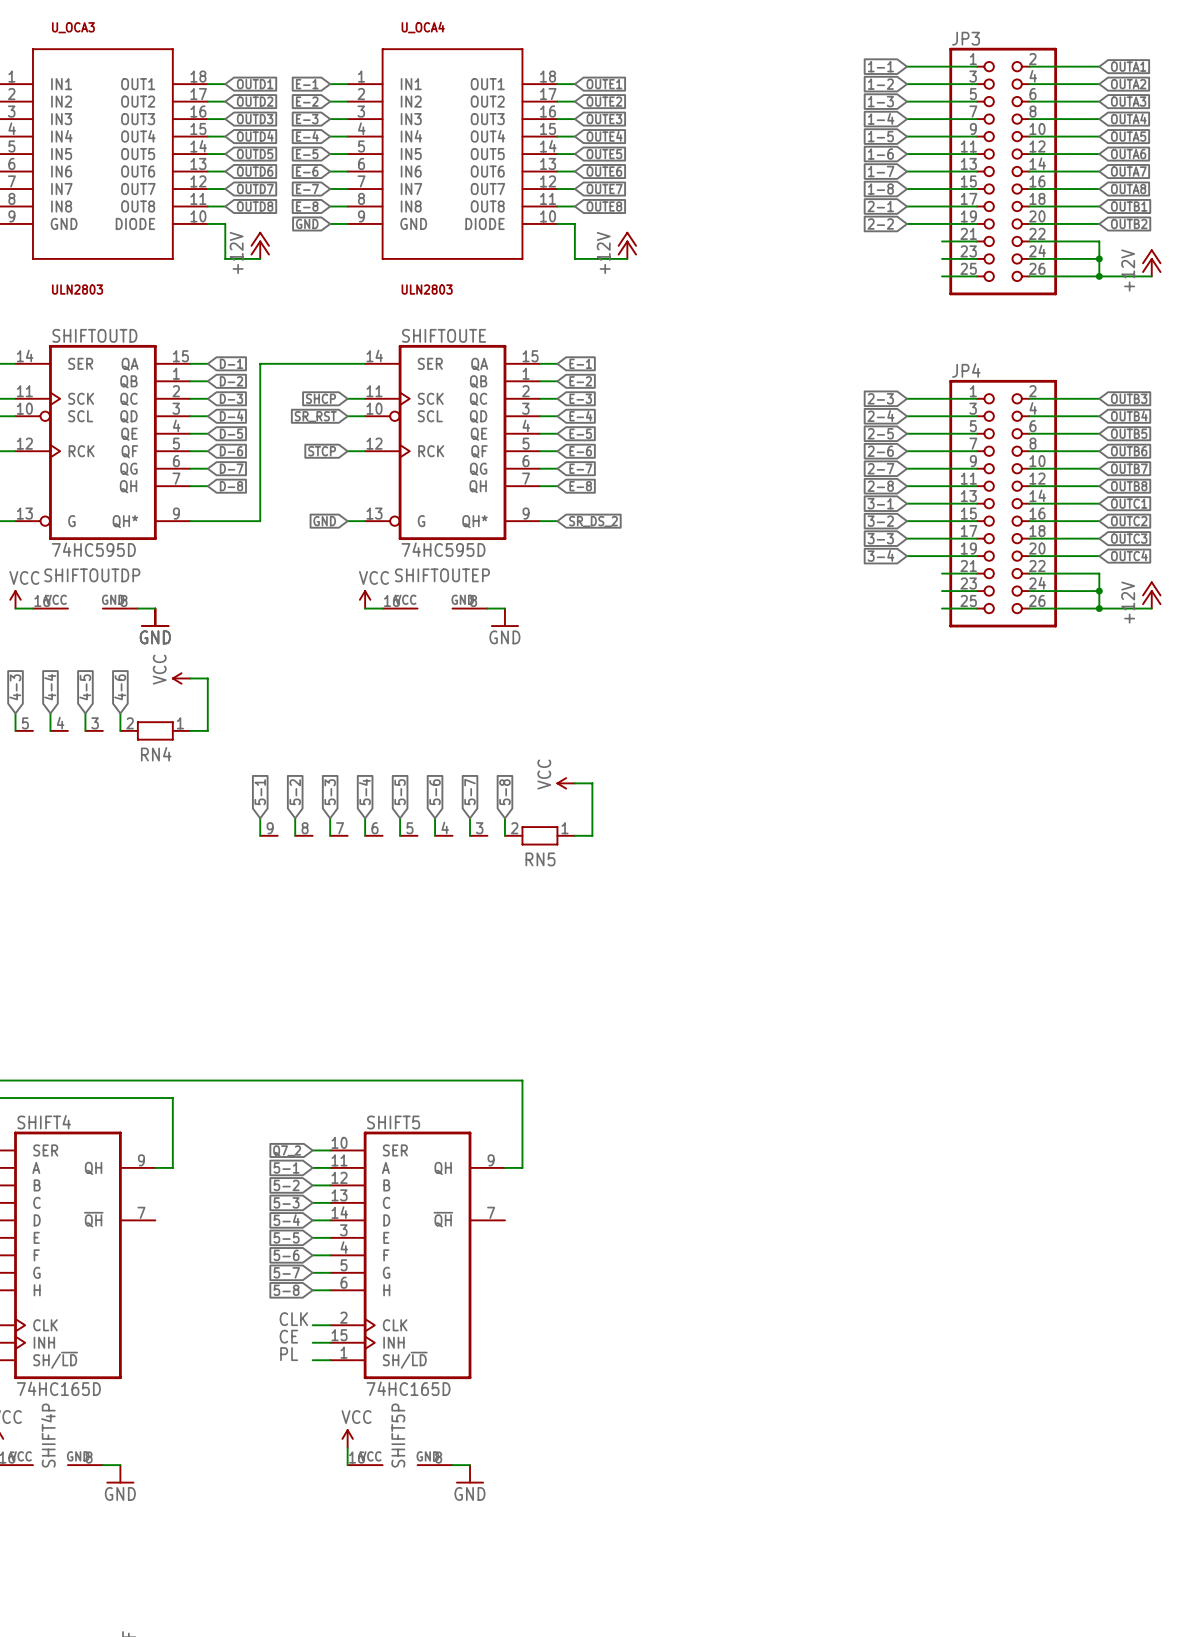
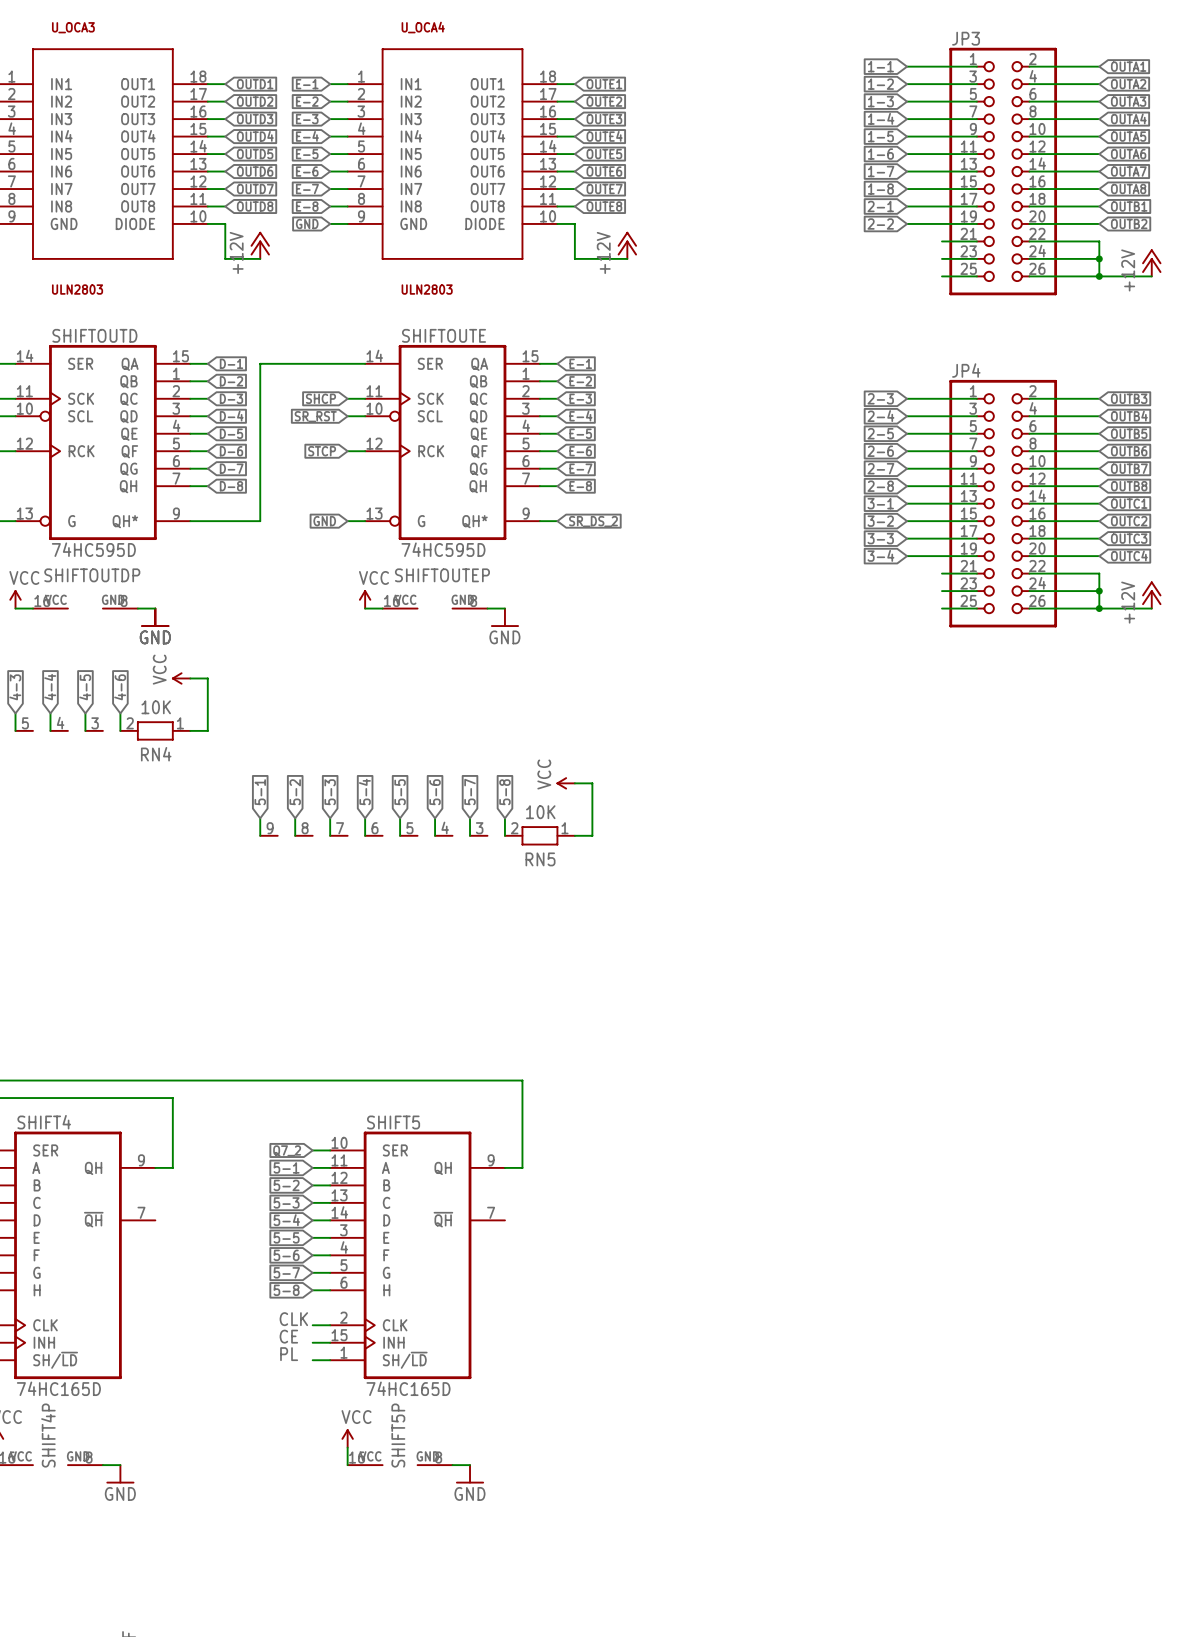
RN4 value: none -> 10K (156, 707)
RN5 value: none -> 10K (540, 812)

